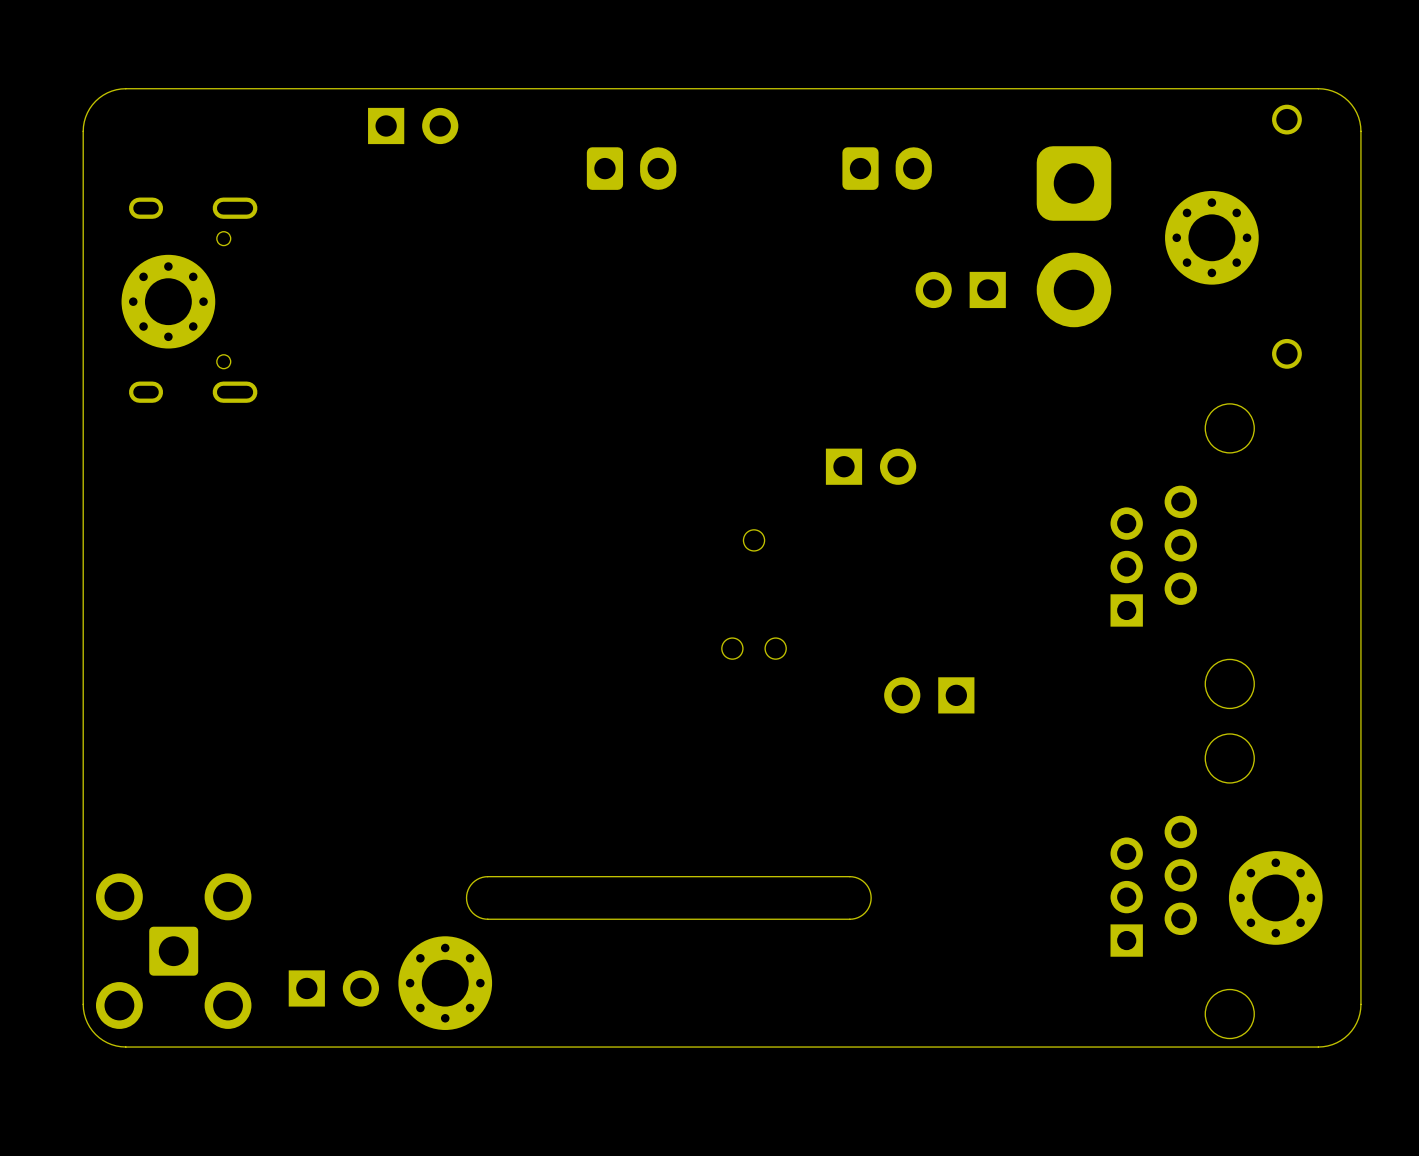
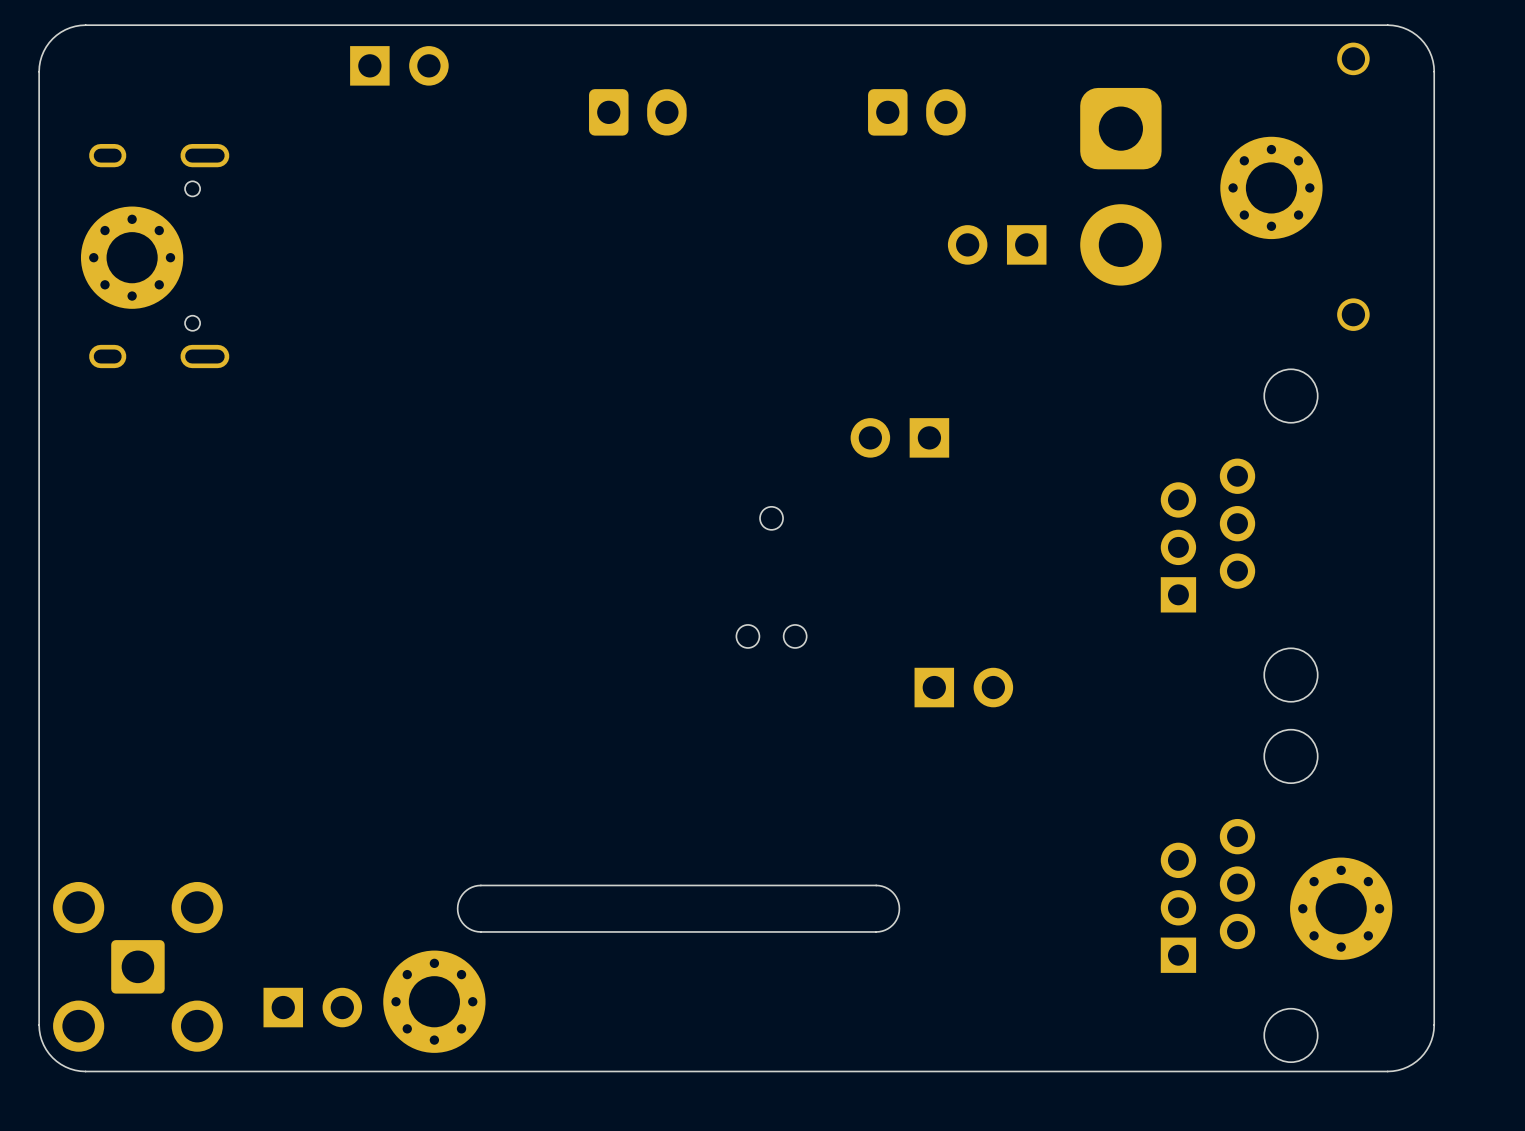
part rotation: 0° (871, 466) -> 180° (899, 437)
part rotation: 0° (929, 695) -> 180° (963, 687)

